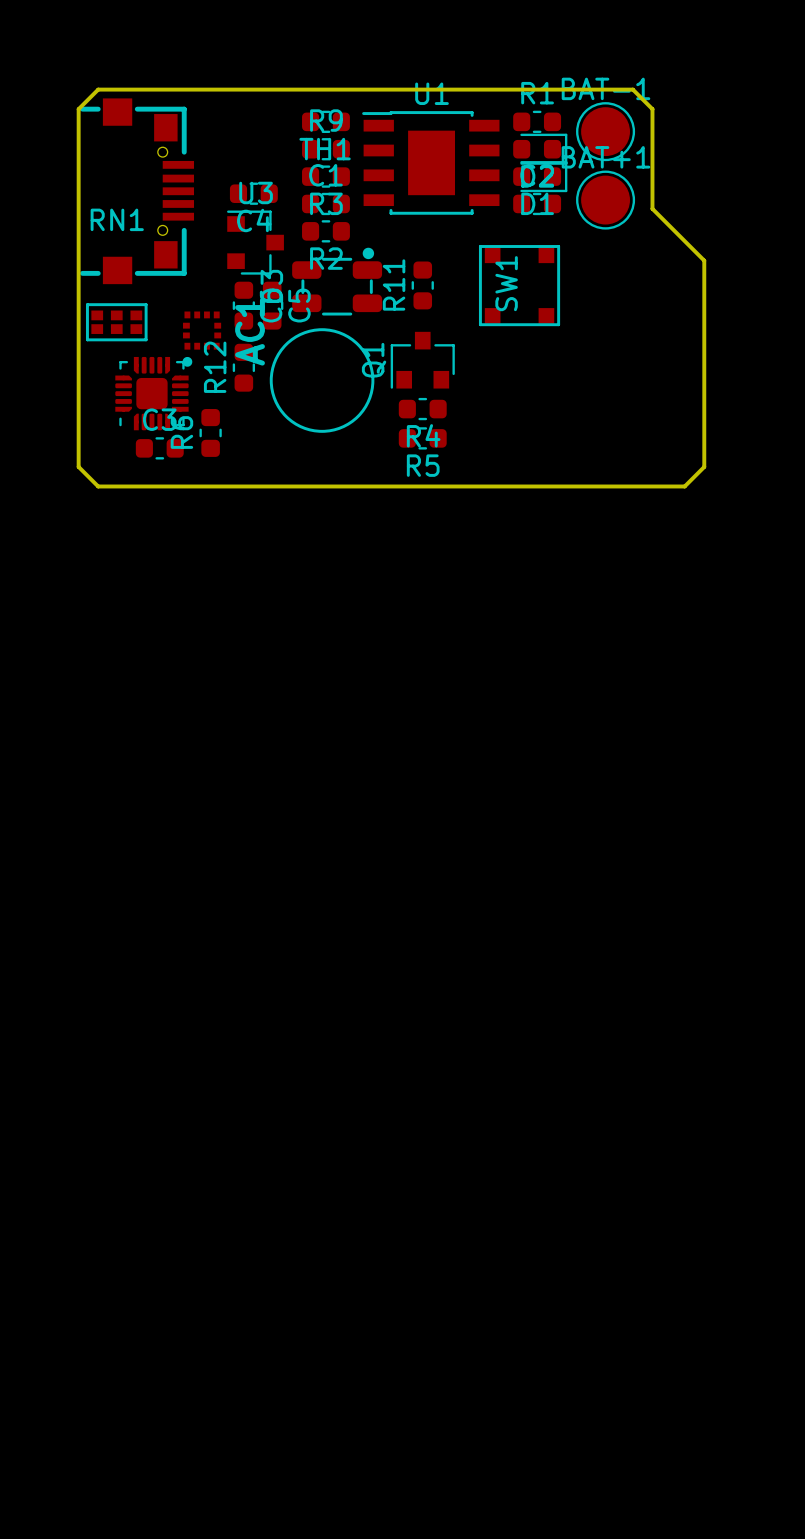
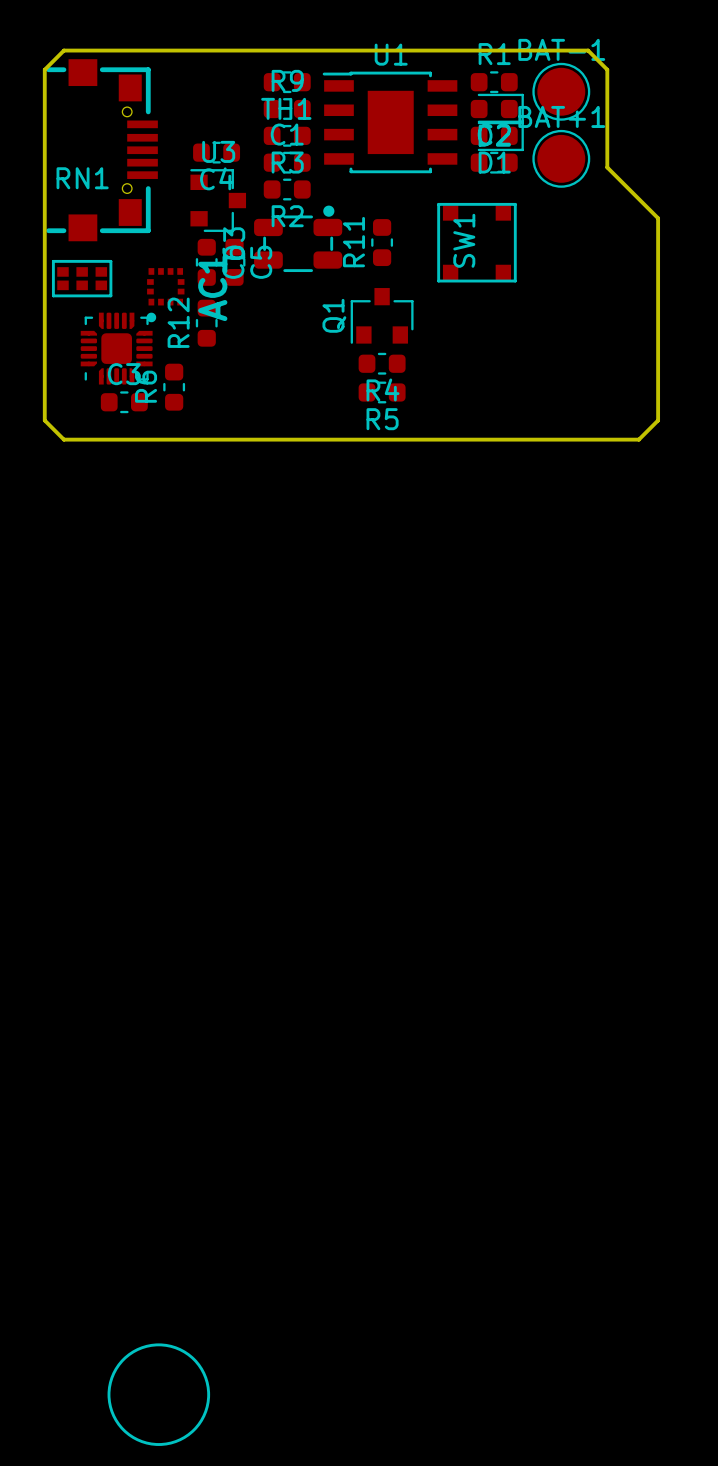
drawing: [269, 328, 375, 433] -> none
drawing: none -> [107, 1343, 211, 1446]

